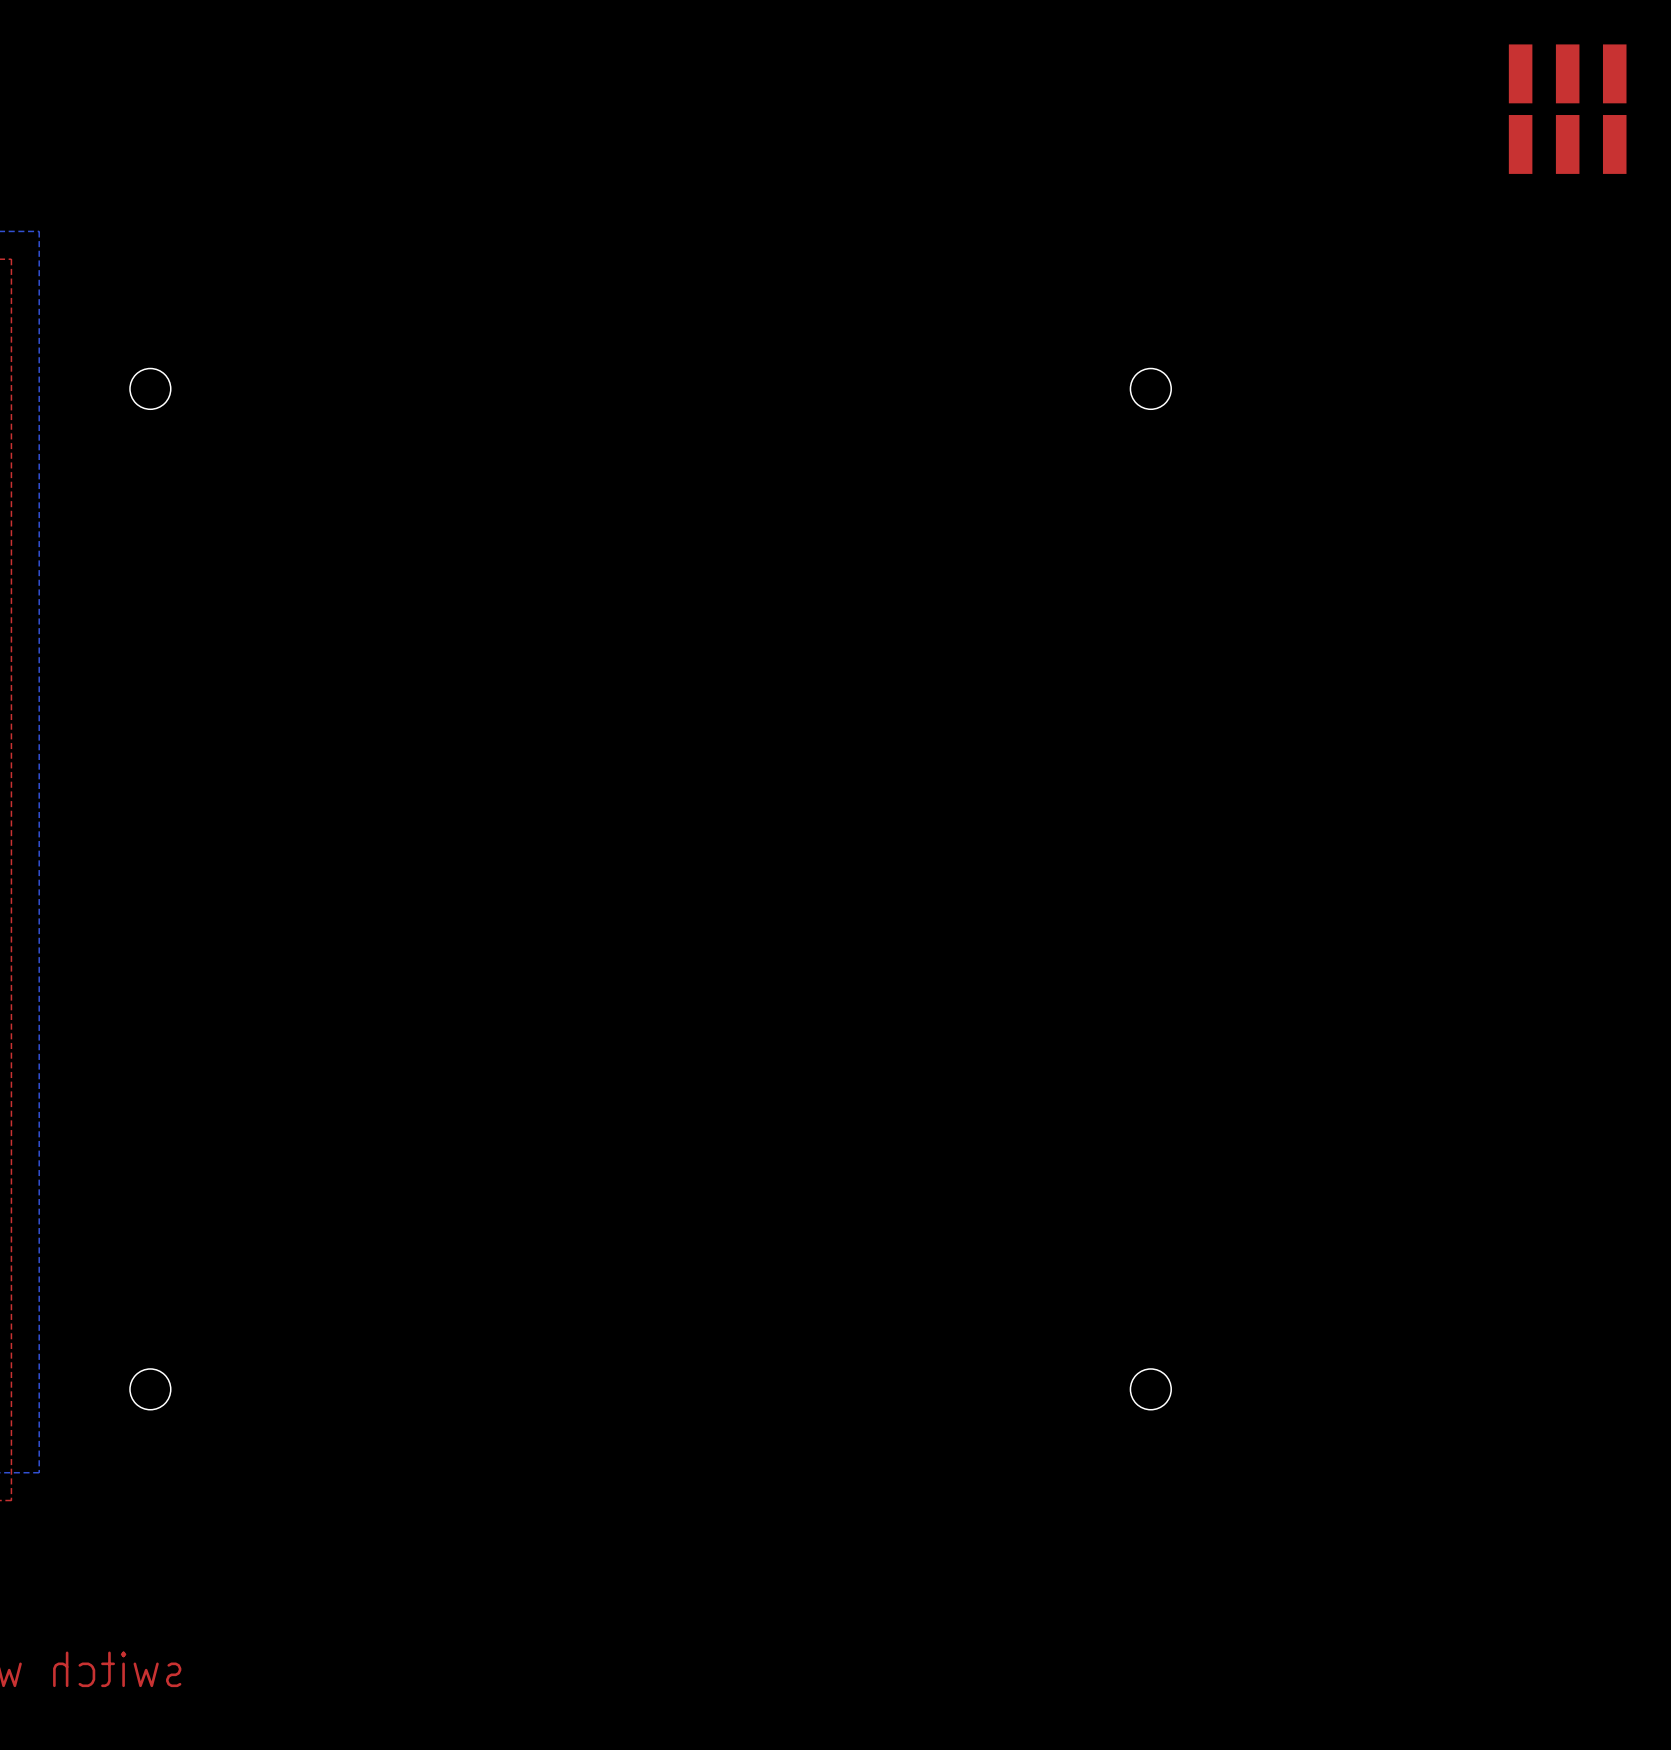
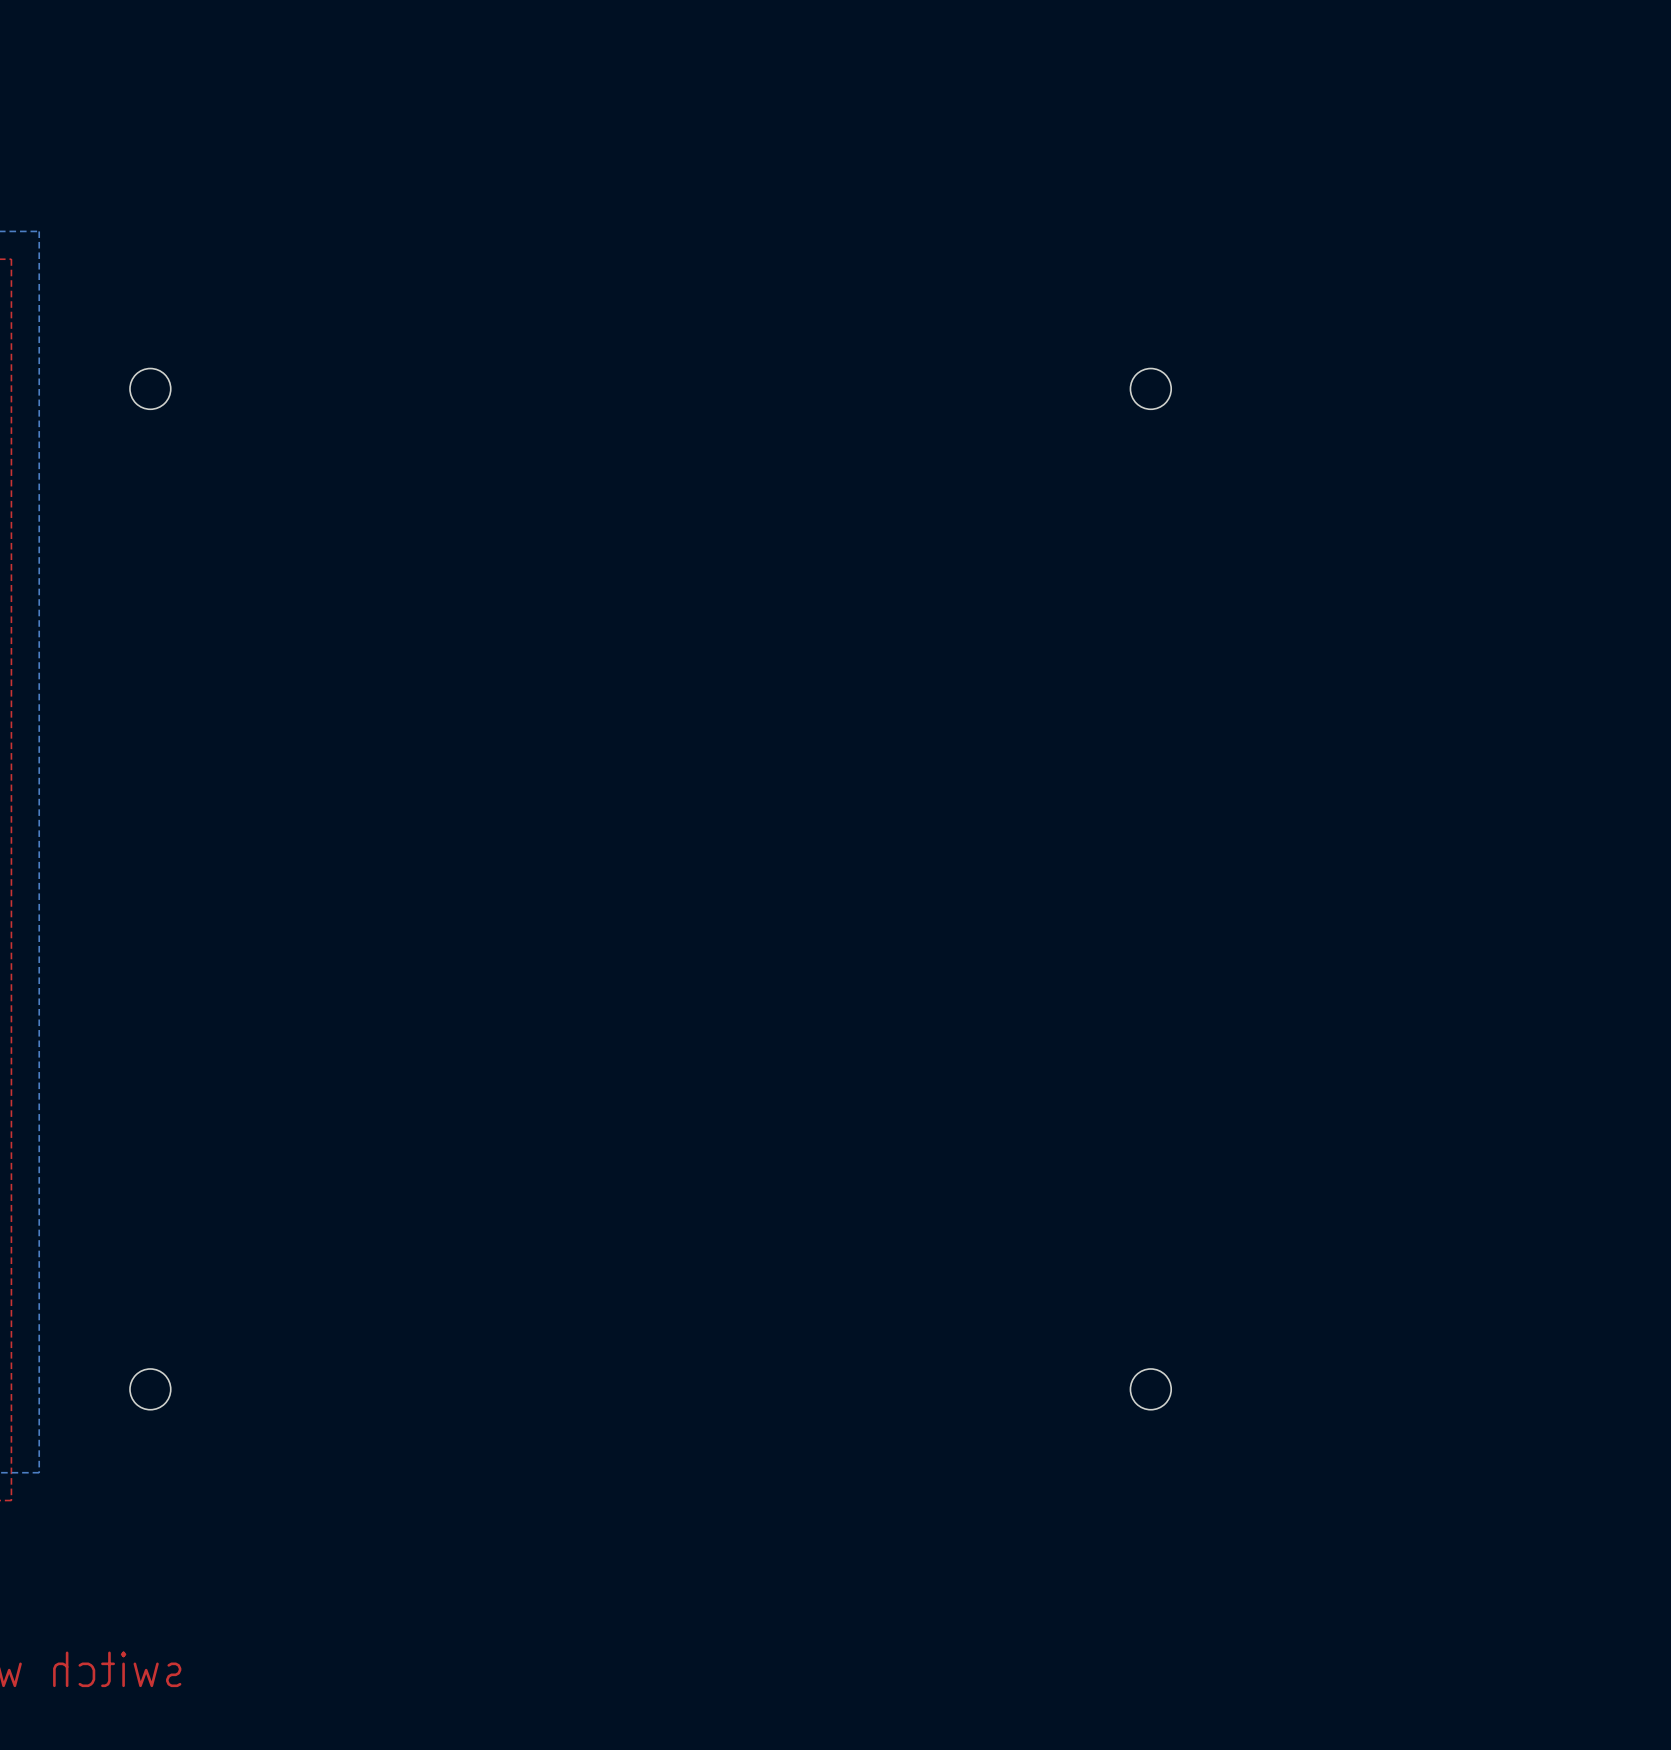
part: (1567, 109) -> none

